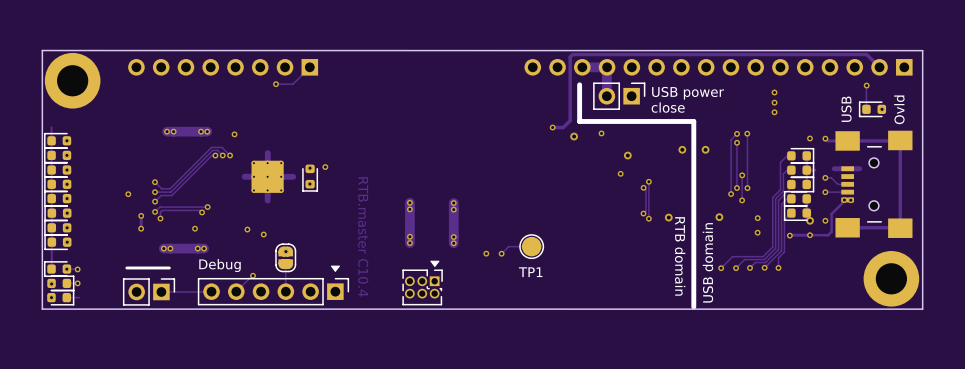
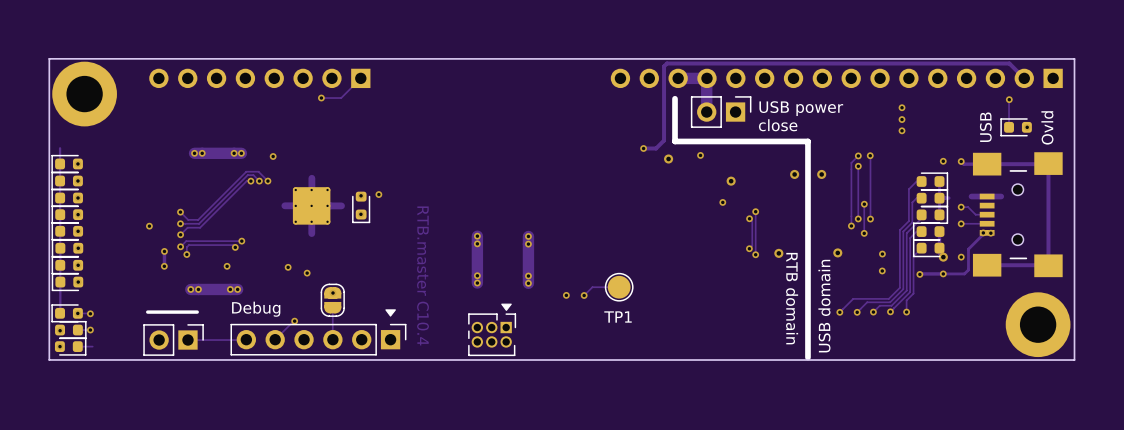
part footprint: [402, 269, 443, 306] -> [468, 313, 517, 357]

